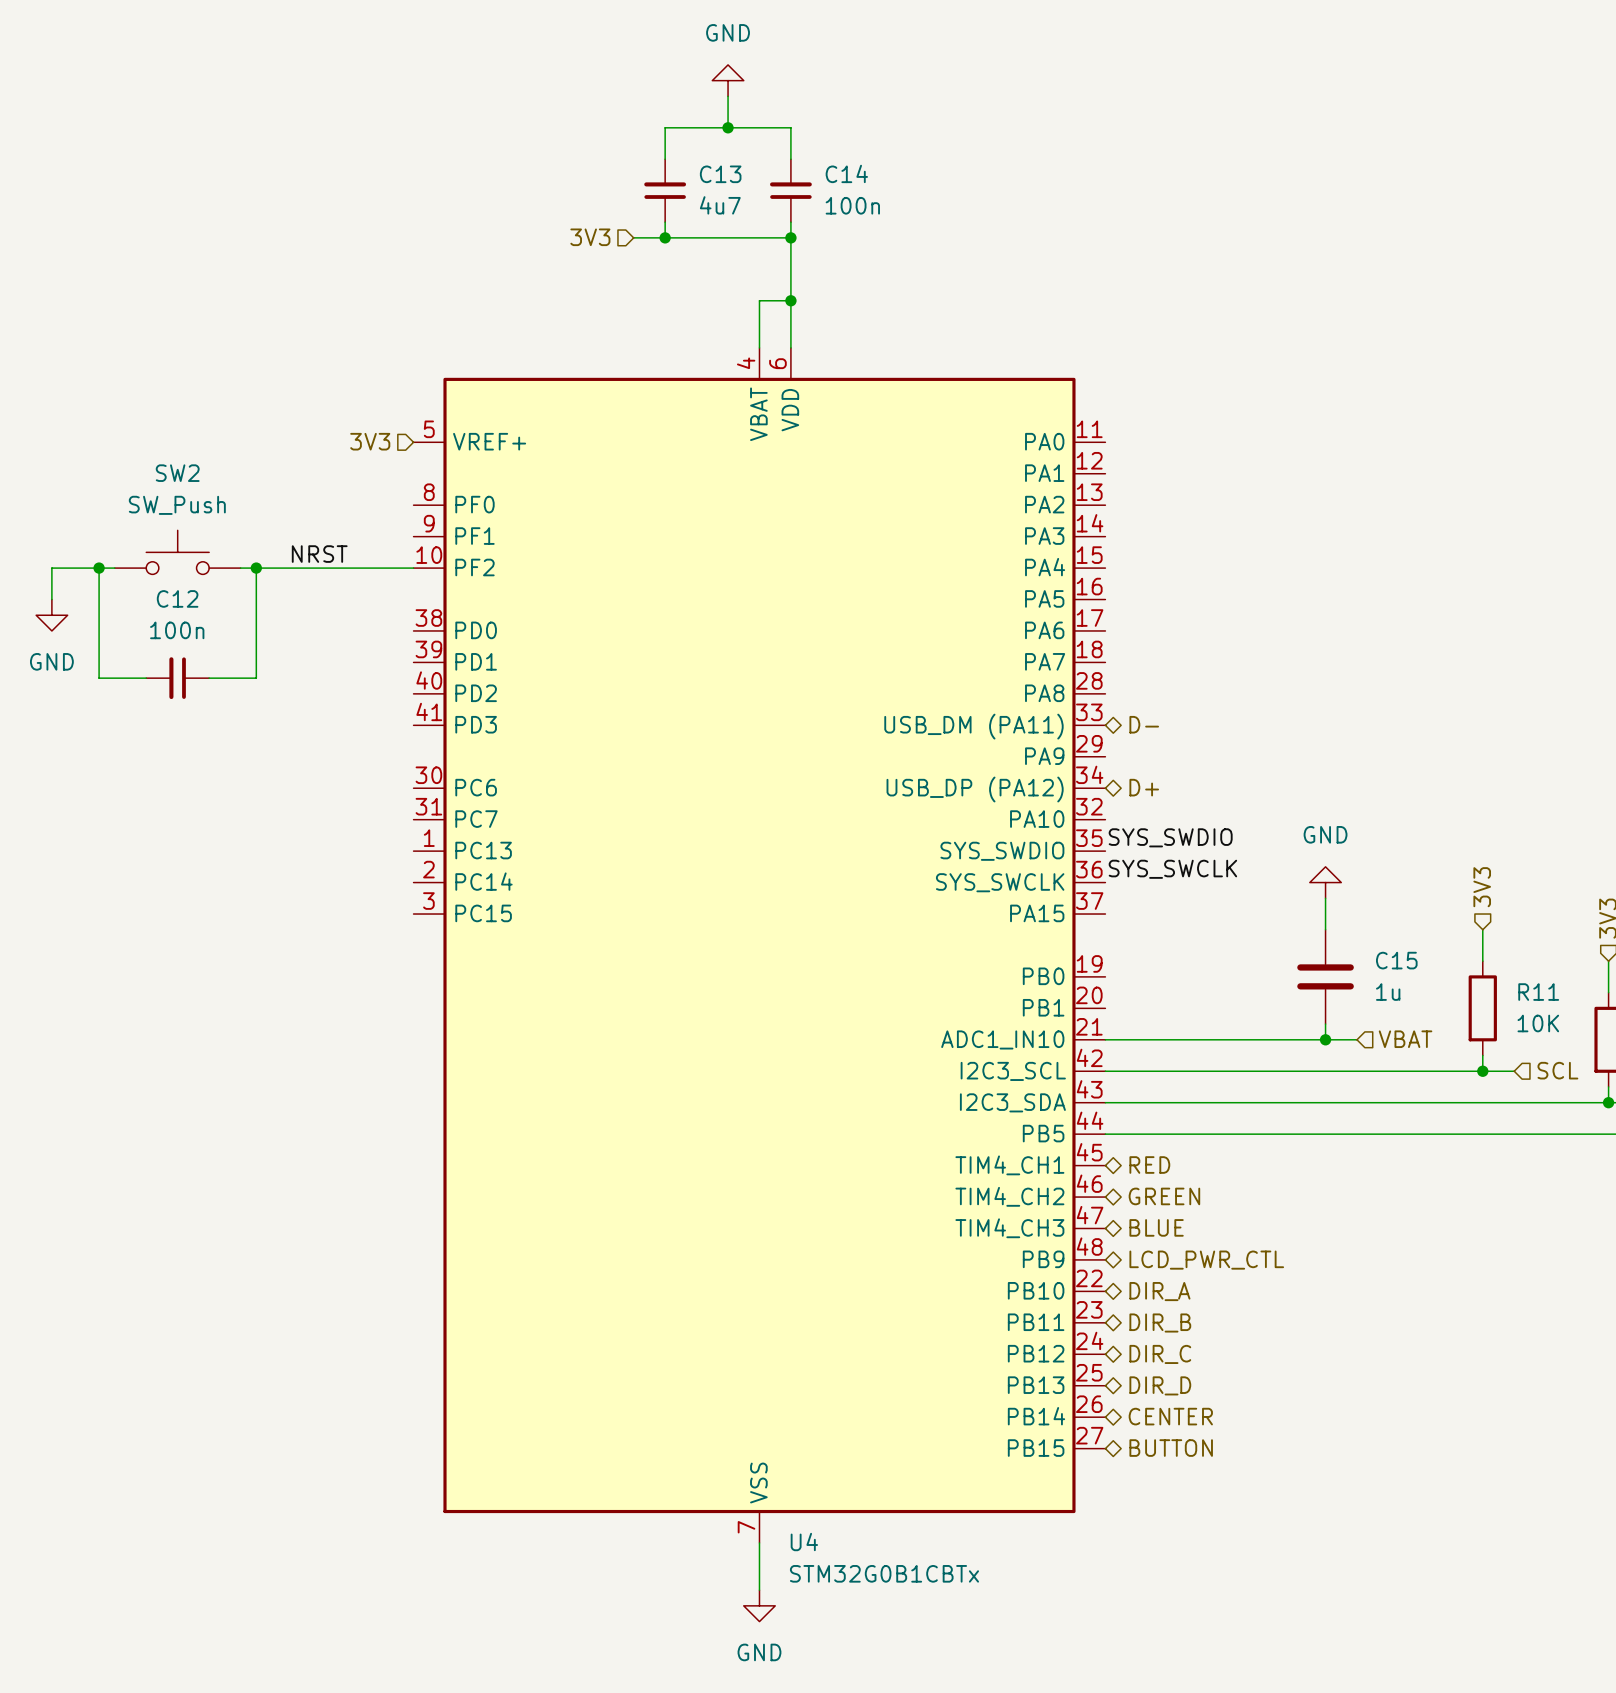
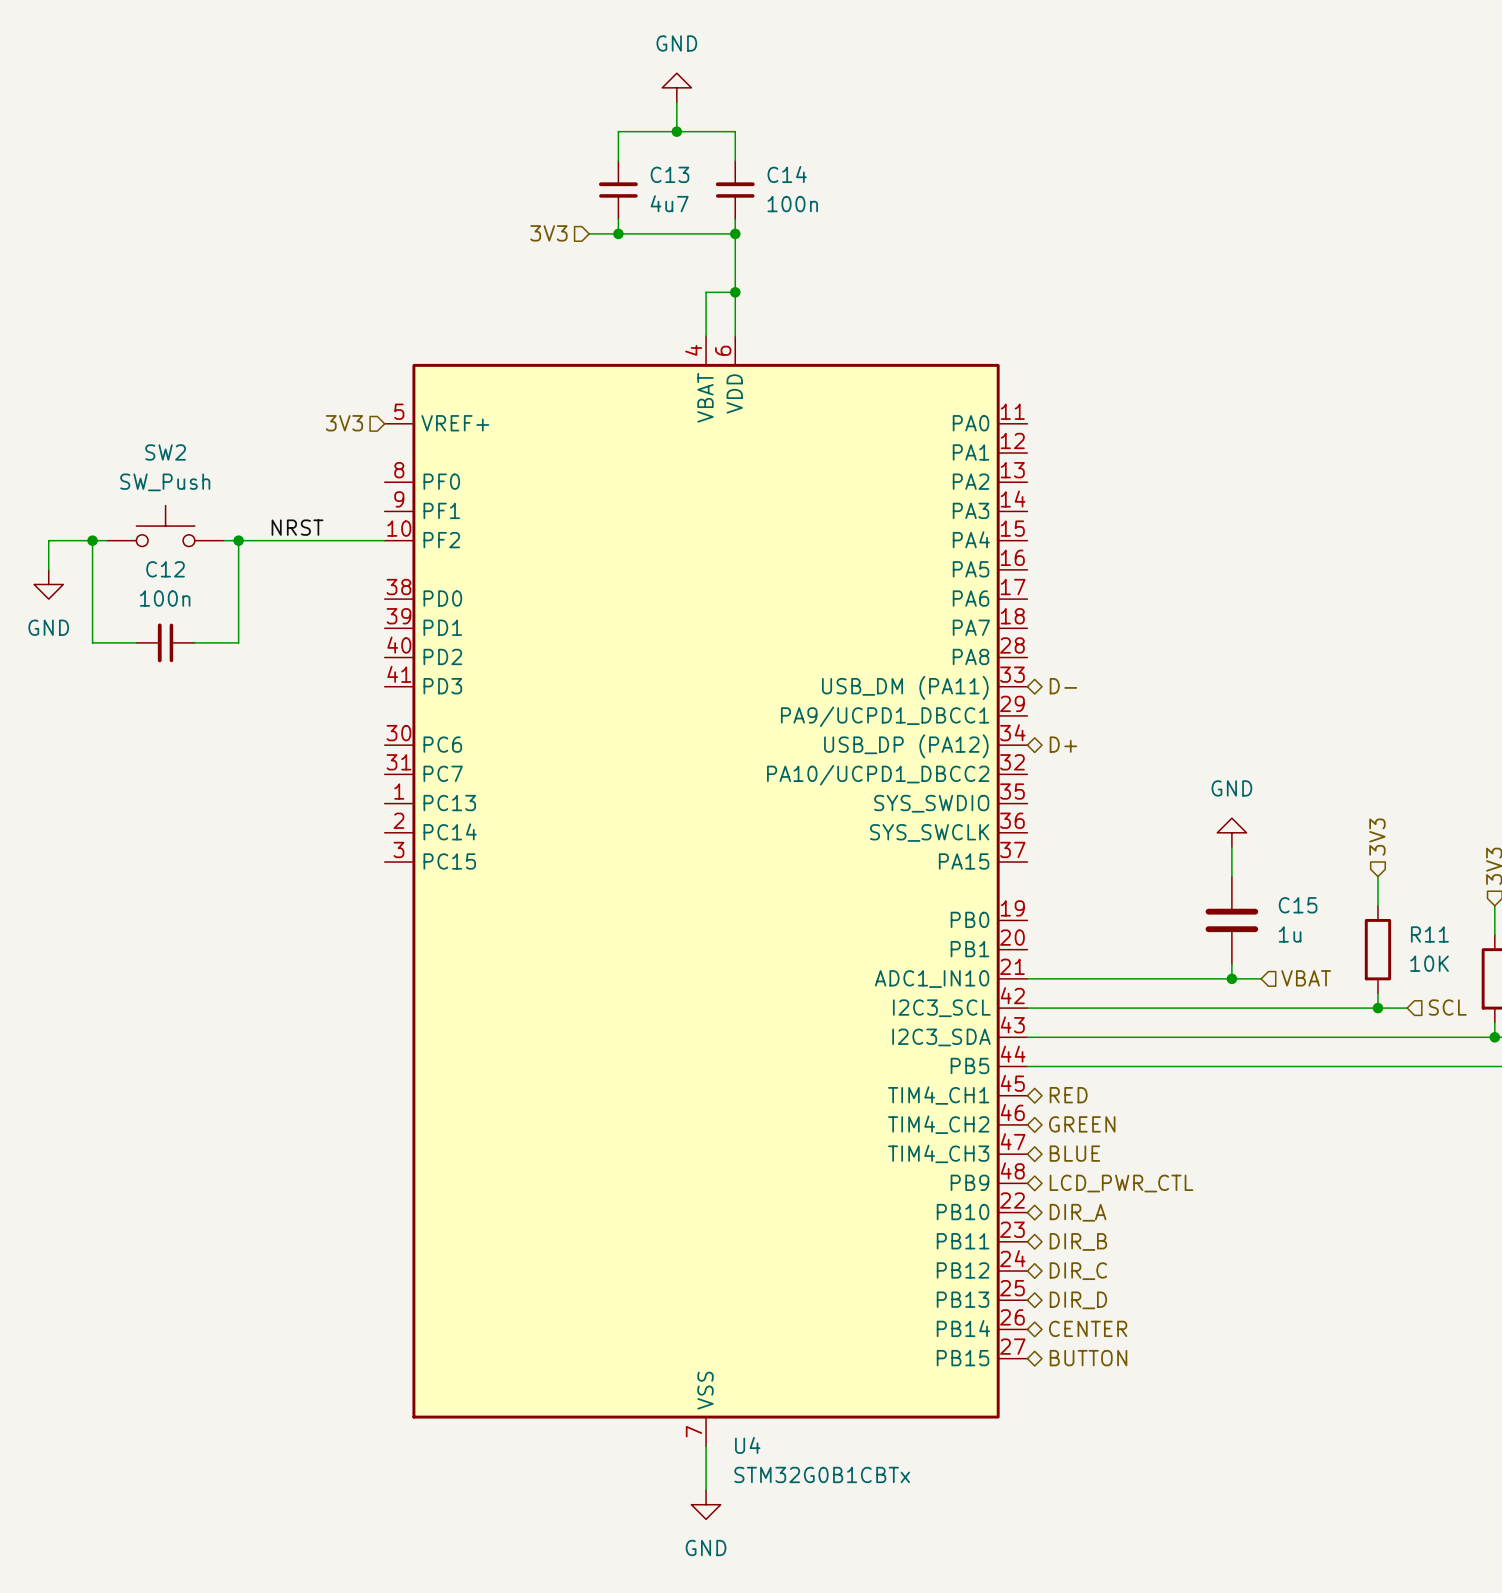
U4 pin name: PA9 (1044, 756) -> PA9/UCPD1_DBCC1 (885, 716)
U4 pin name: PA10 (1037, 819) -> PA10/UCPD1_DBCC2 (878, 775)
label: SYS_SWDIO (1170, 837) -> none
label: SYS_SWCLK (1172, 869) -> none

